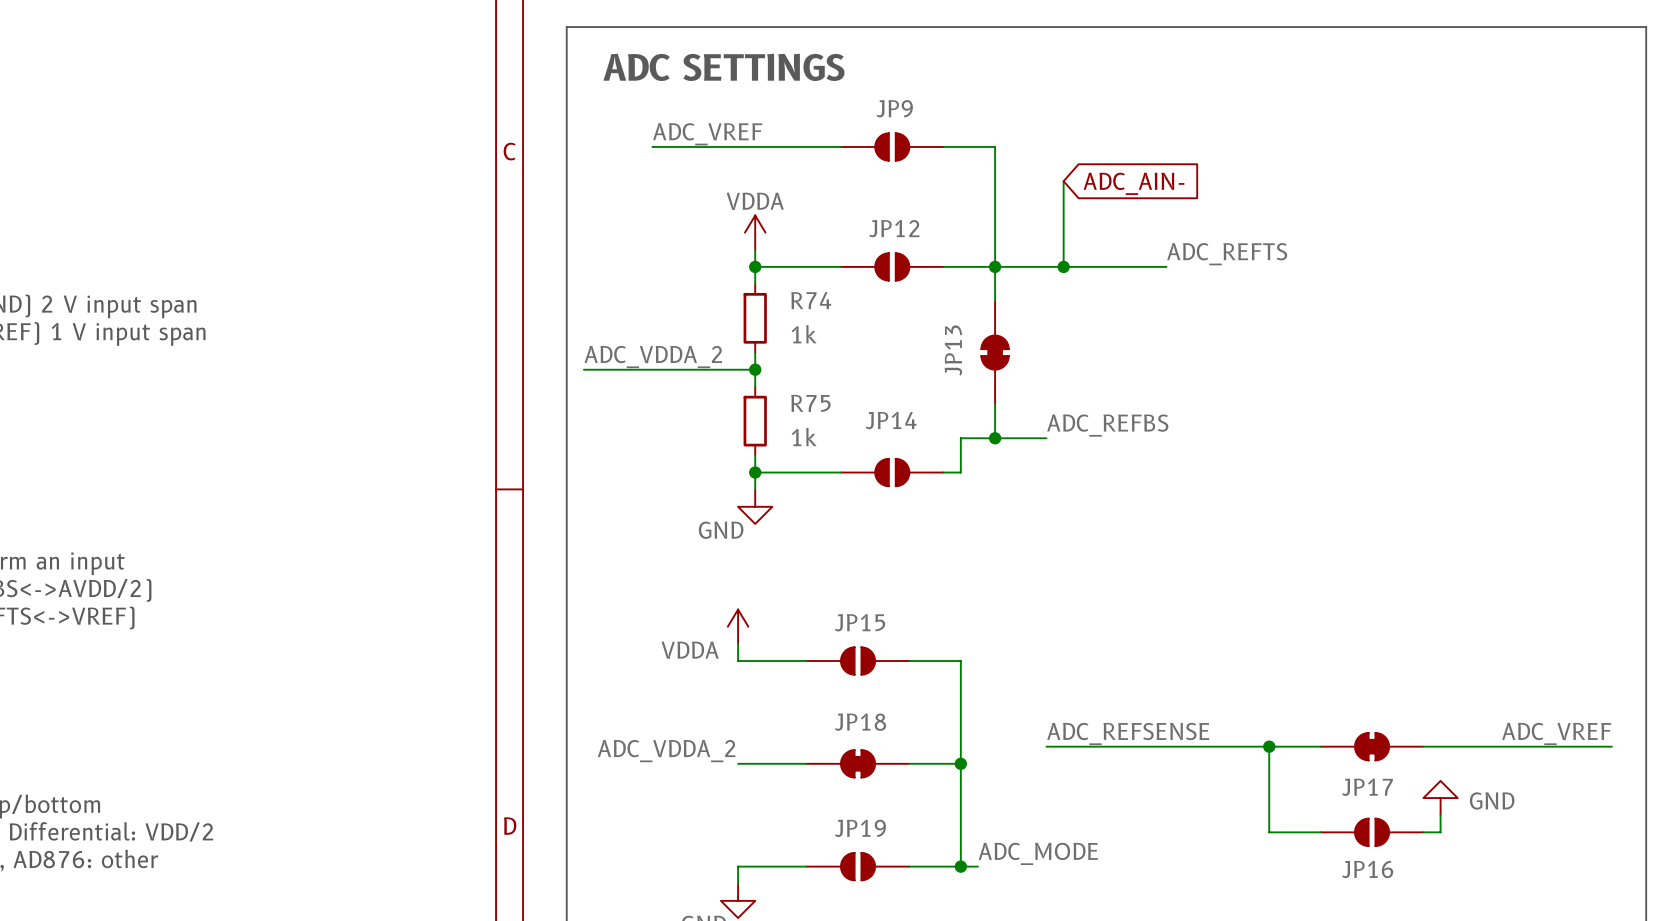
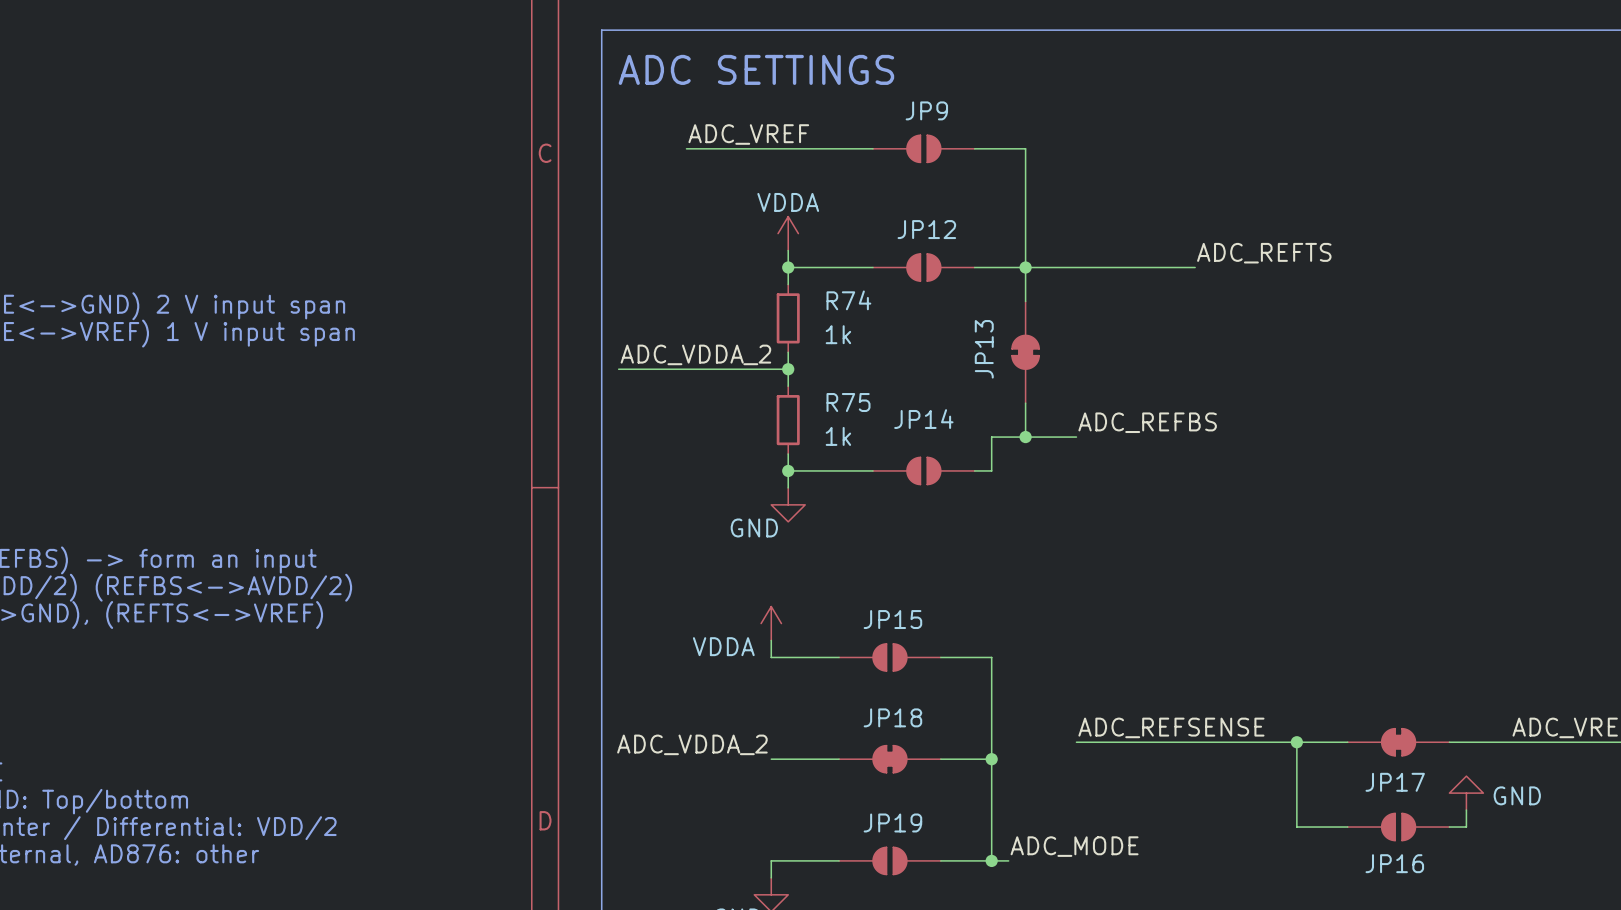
wire: (1063, 181) (1063, 266) -> none
global label: ADC_AIN- (1133, 183) -> none
junction: (1063, 266) -> none

